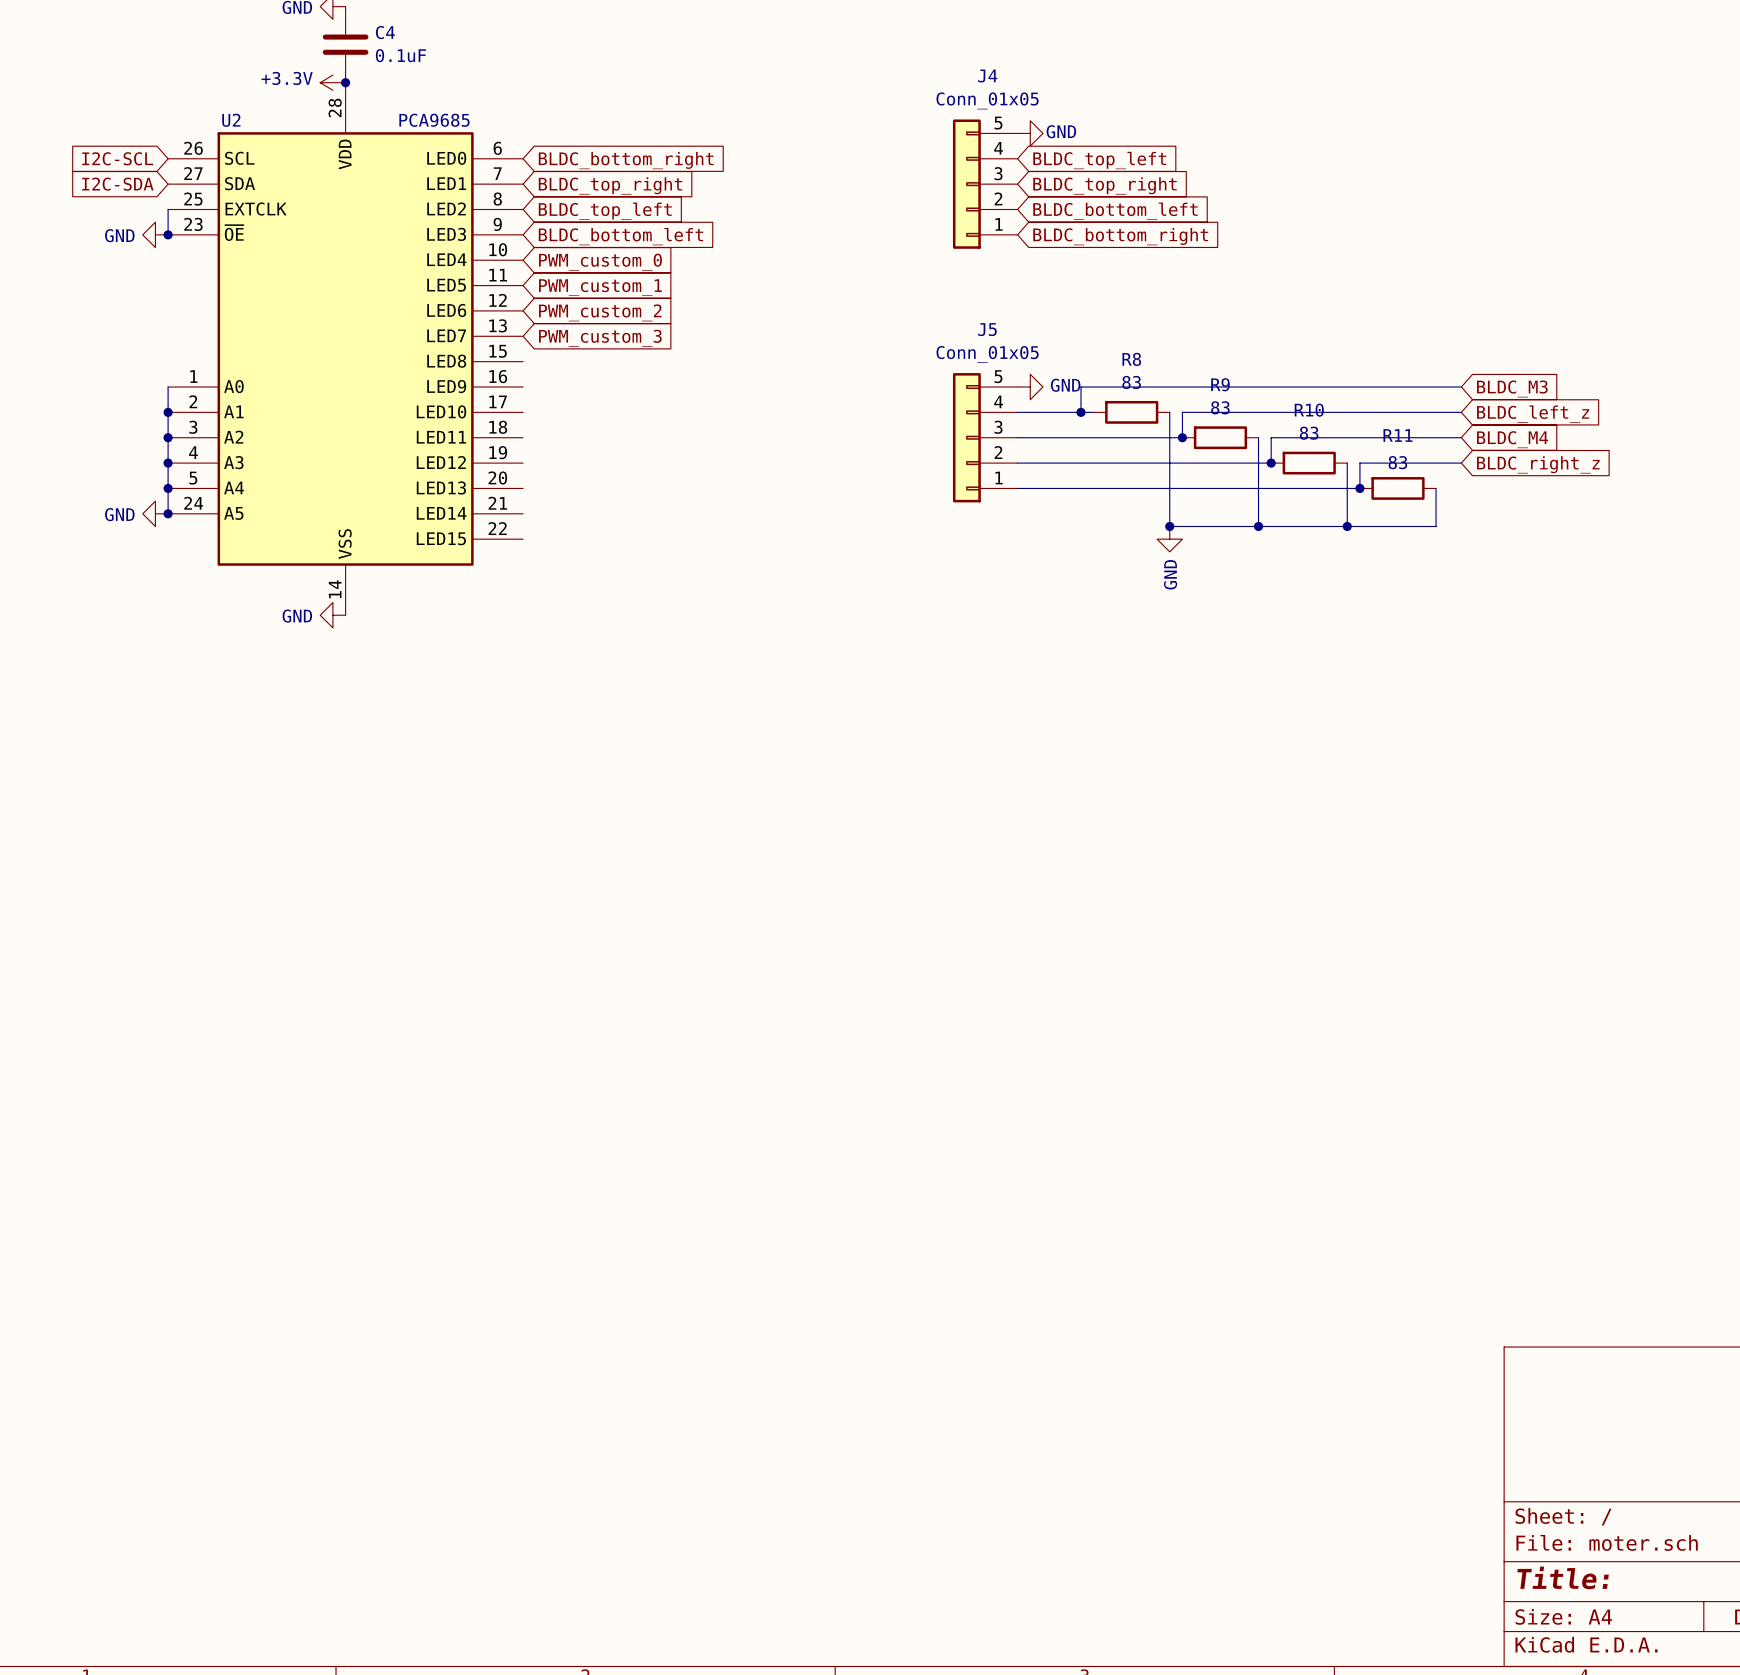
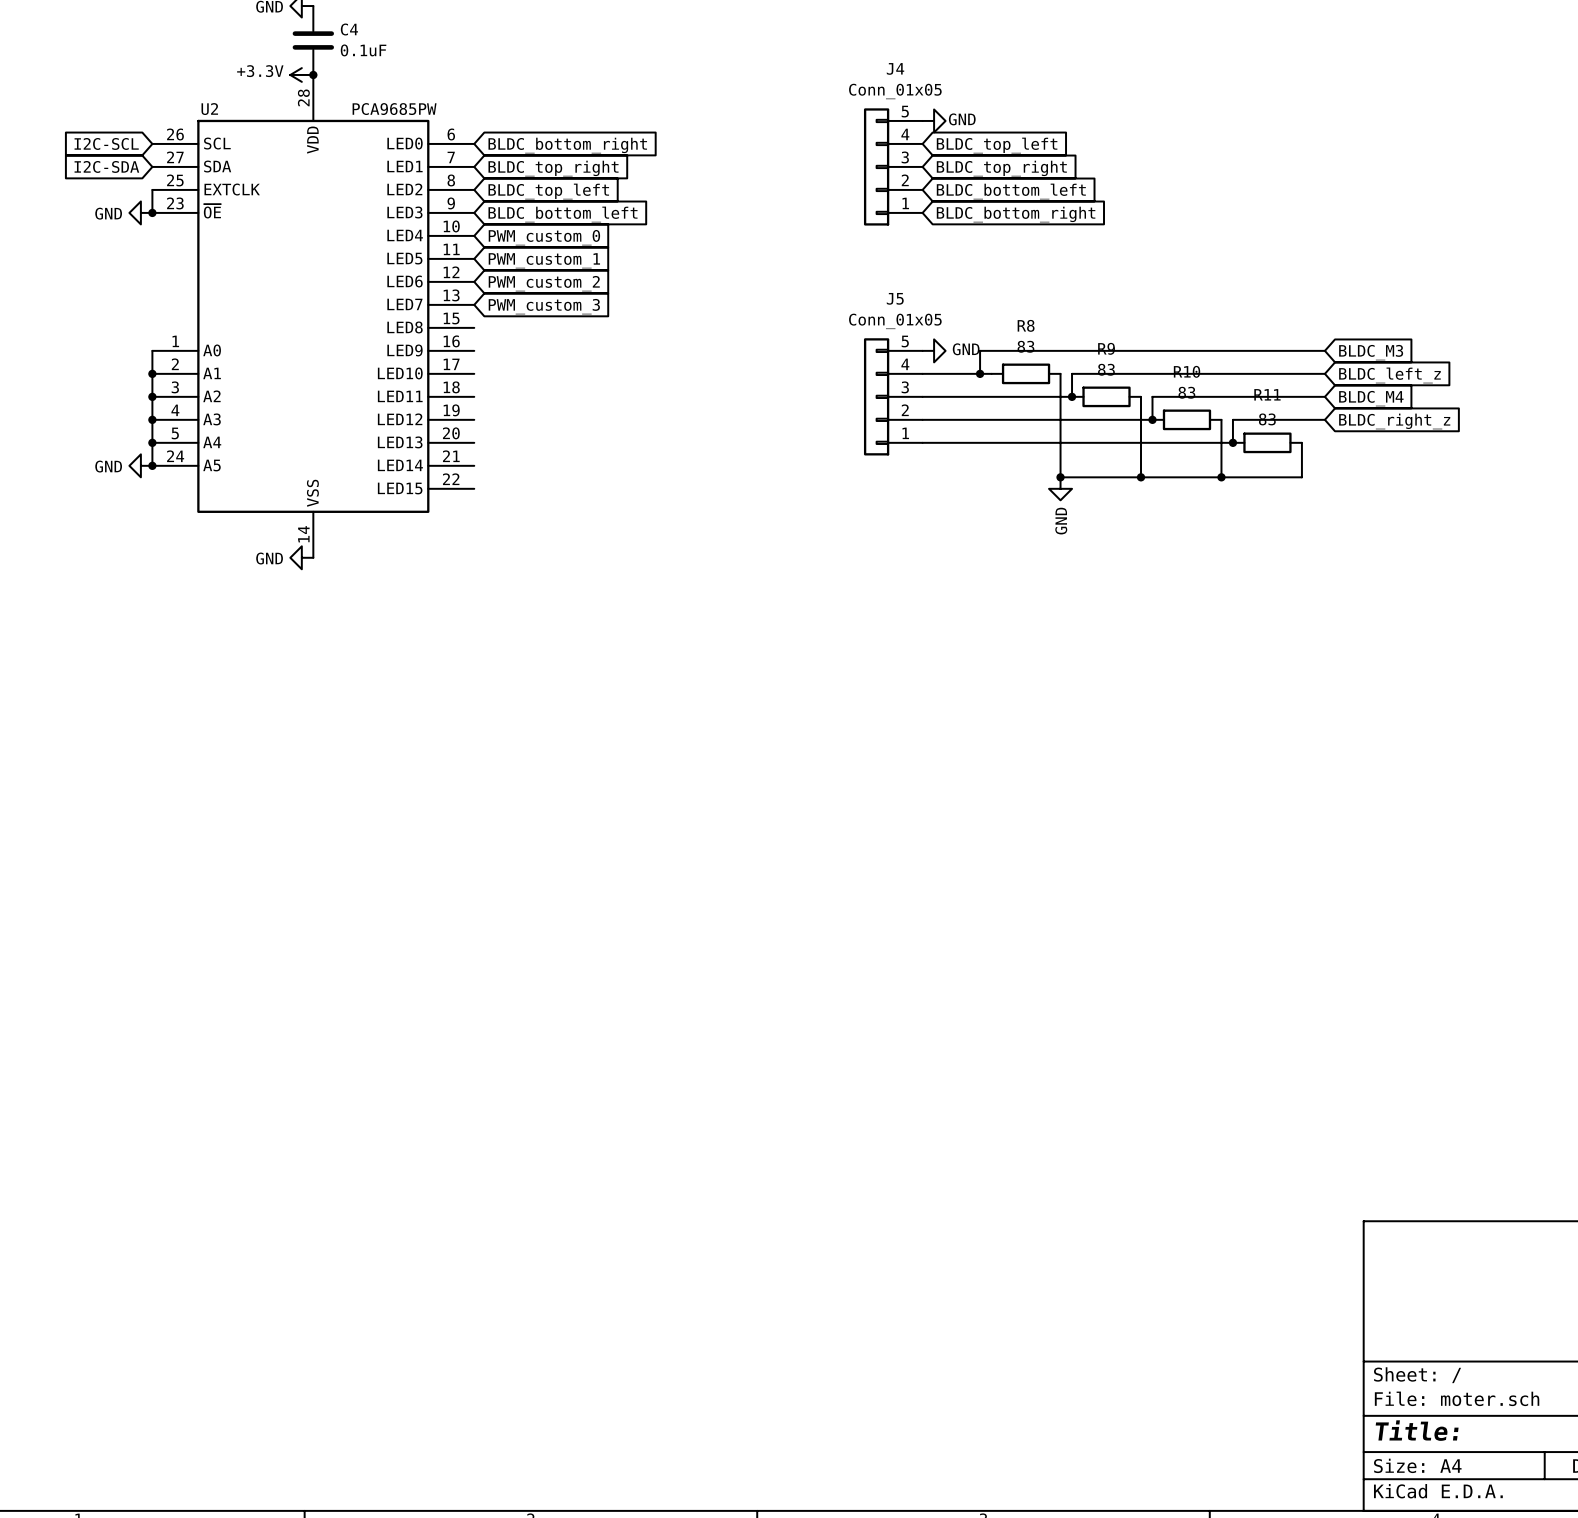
U2 value: PCA9685 (434, 120) -> PCA9685PW (394, 109)

